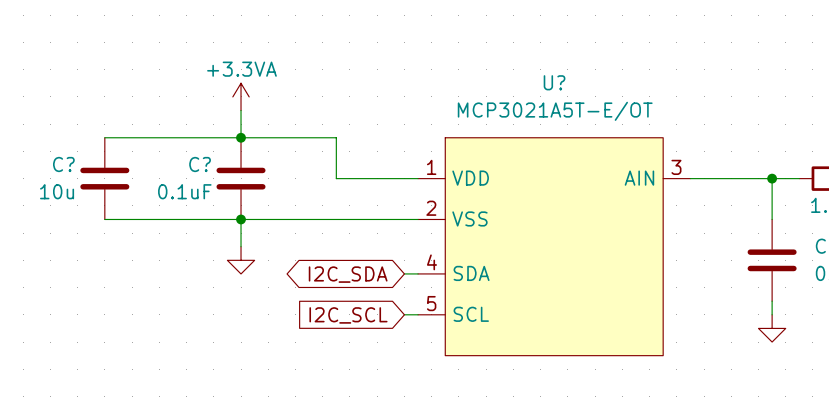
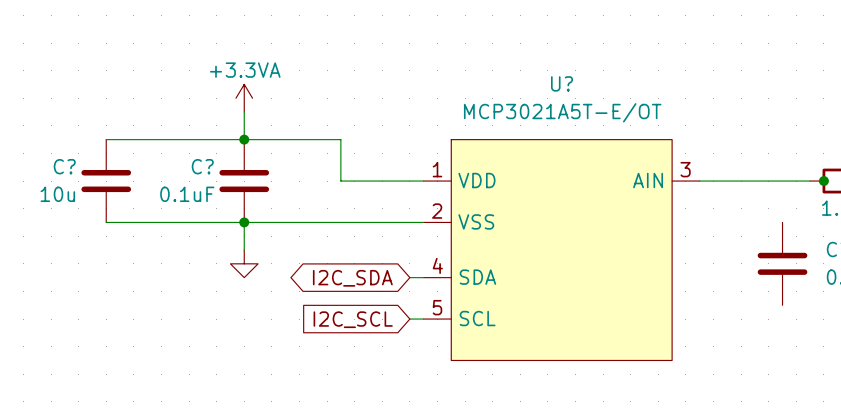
wire: (772, 178) (772, 219) -> none
junction position: (772, 178) -> (823, 181)
wire: (772, 301) (772, 314) -> none
power symbol: (772, 328) -> none

